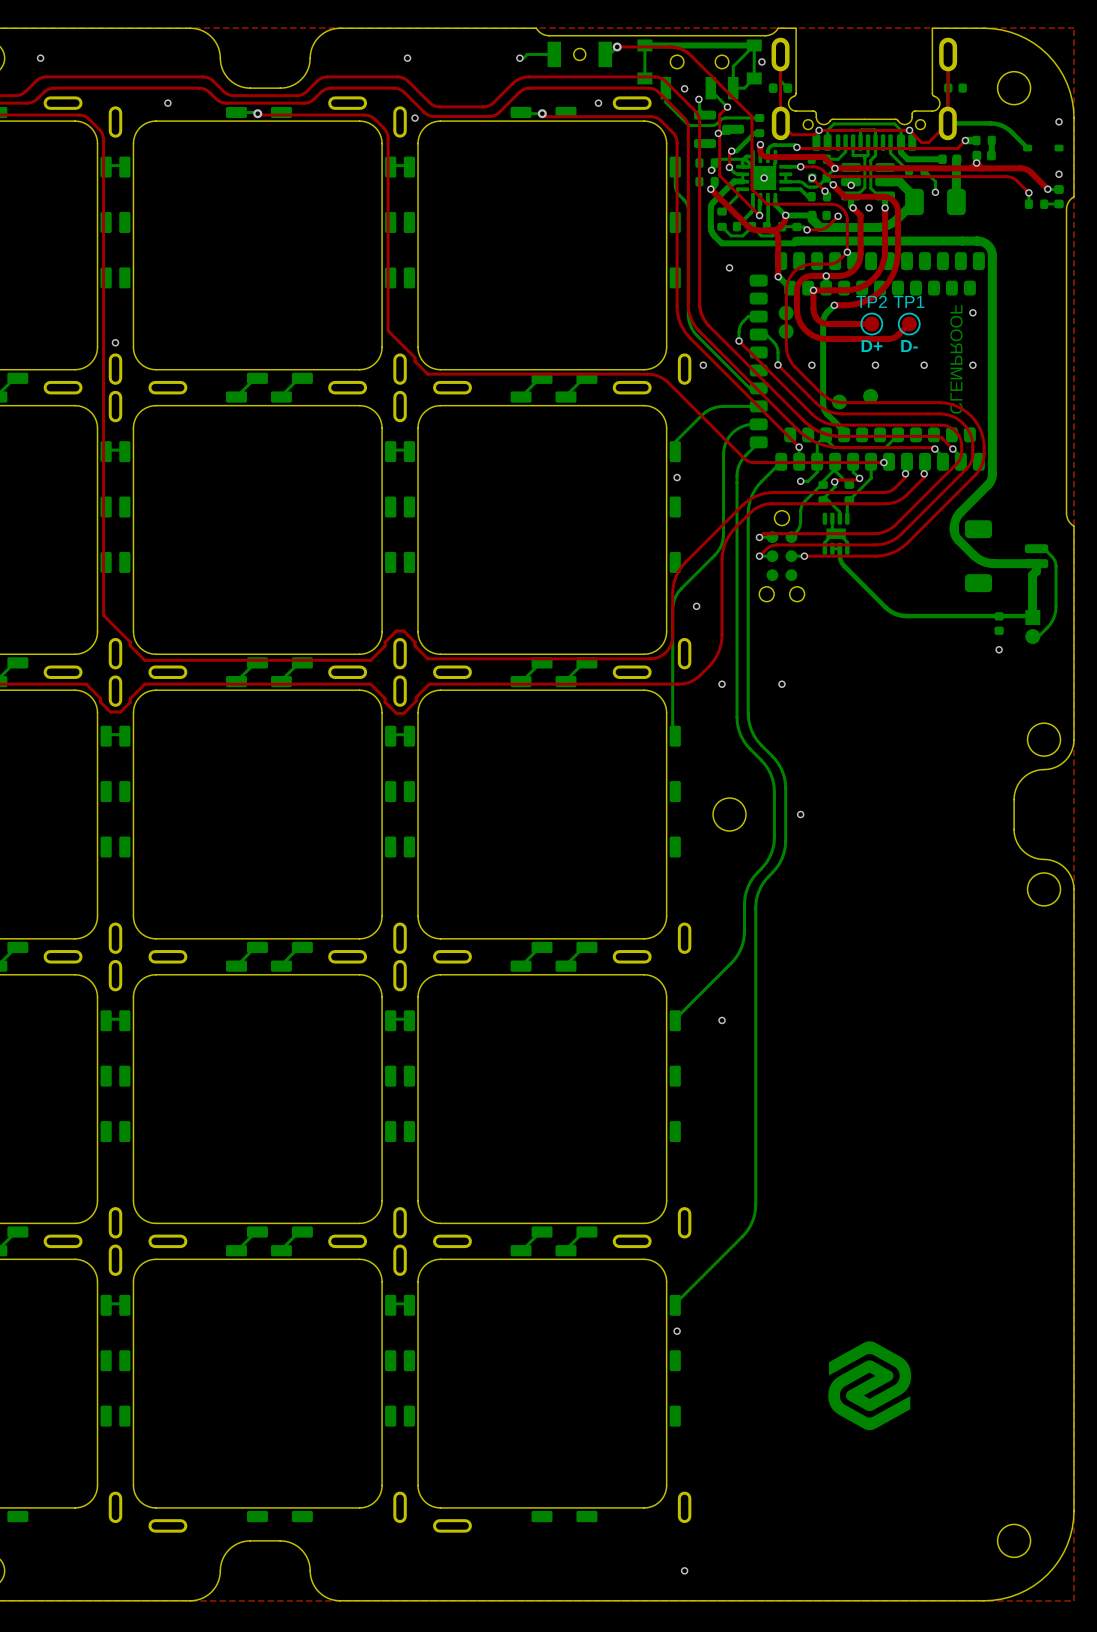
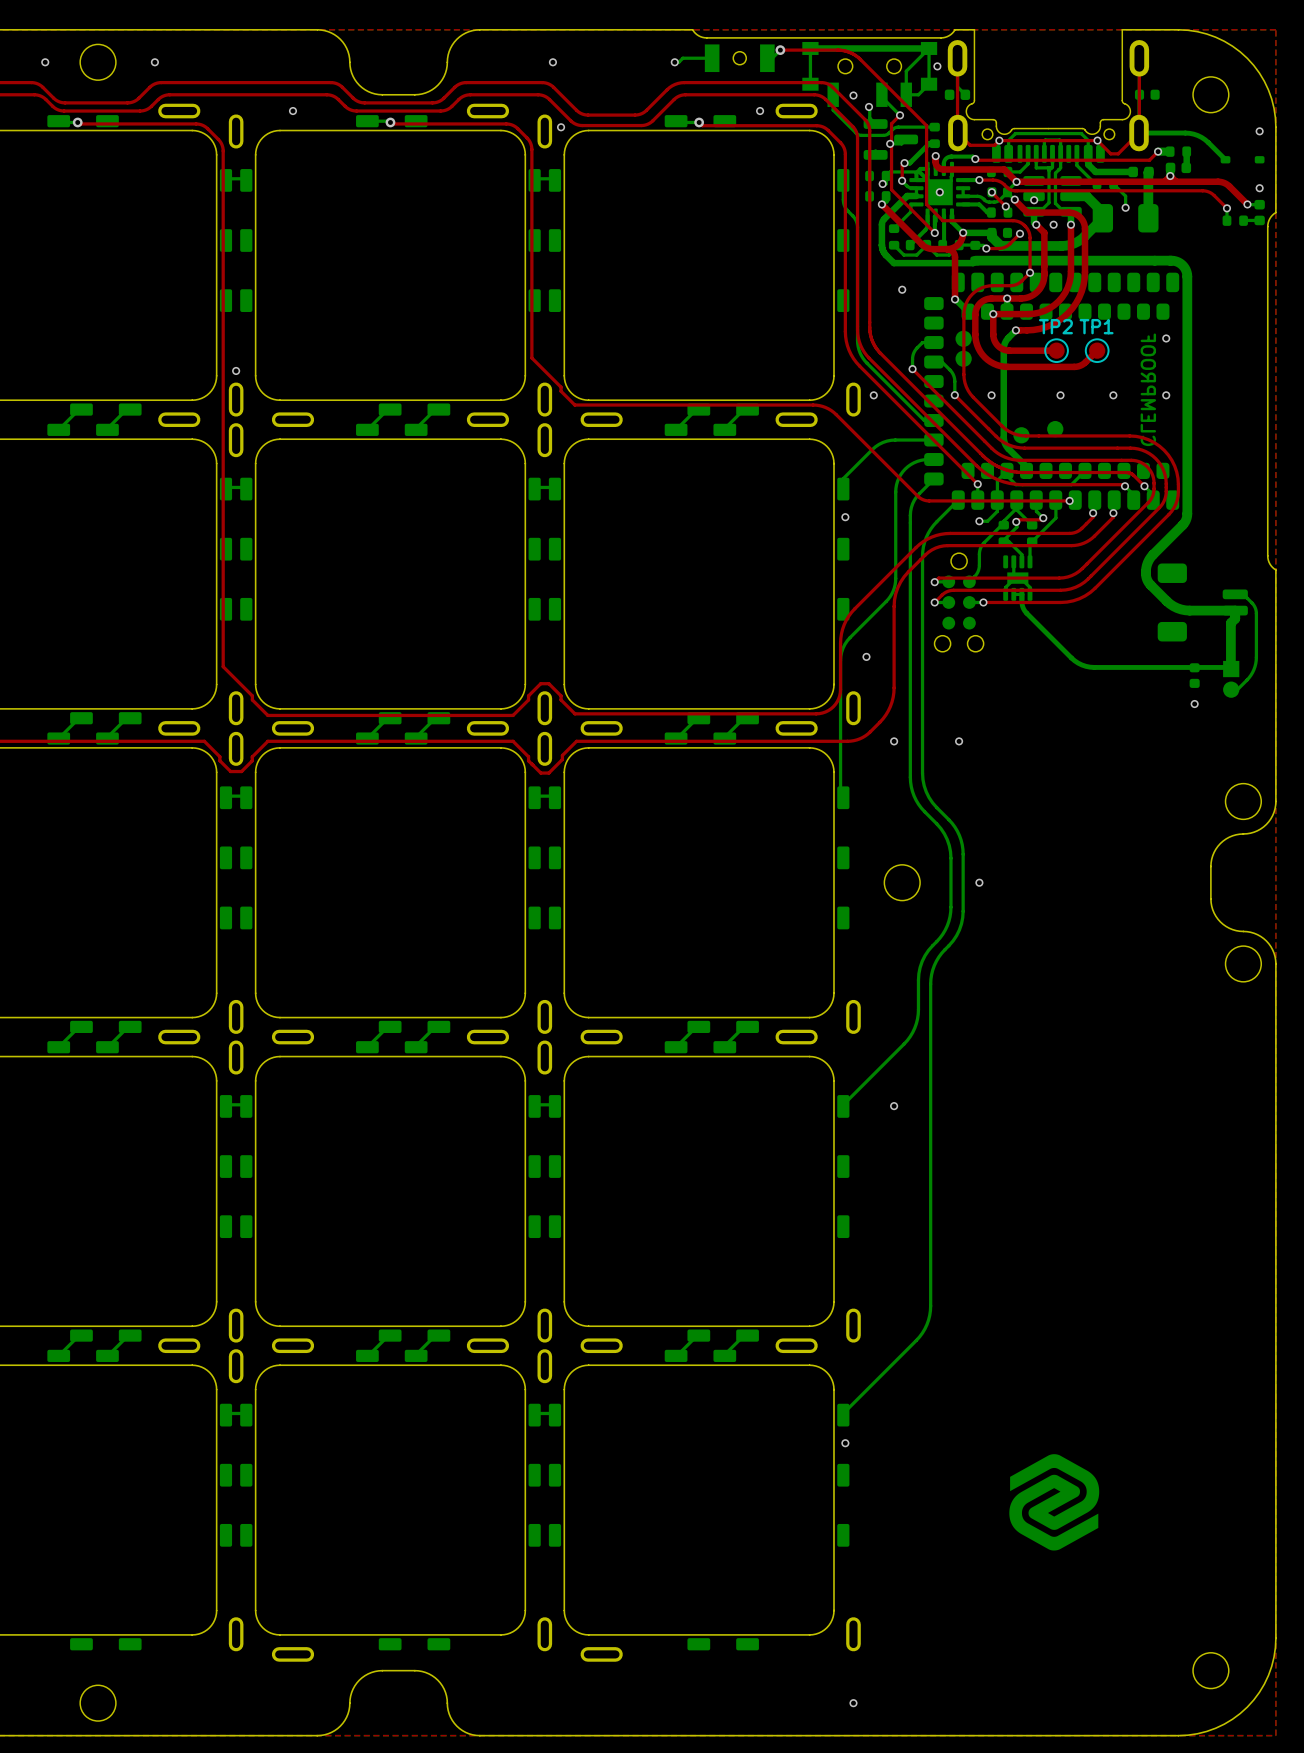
text: D+ (872, 346) -> none
text: D- (909, 346) -> none

